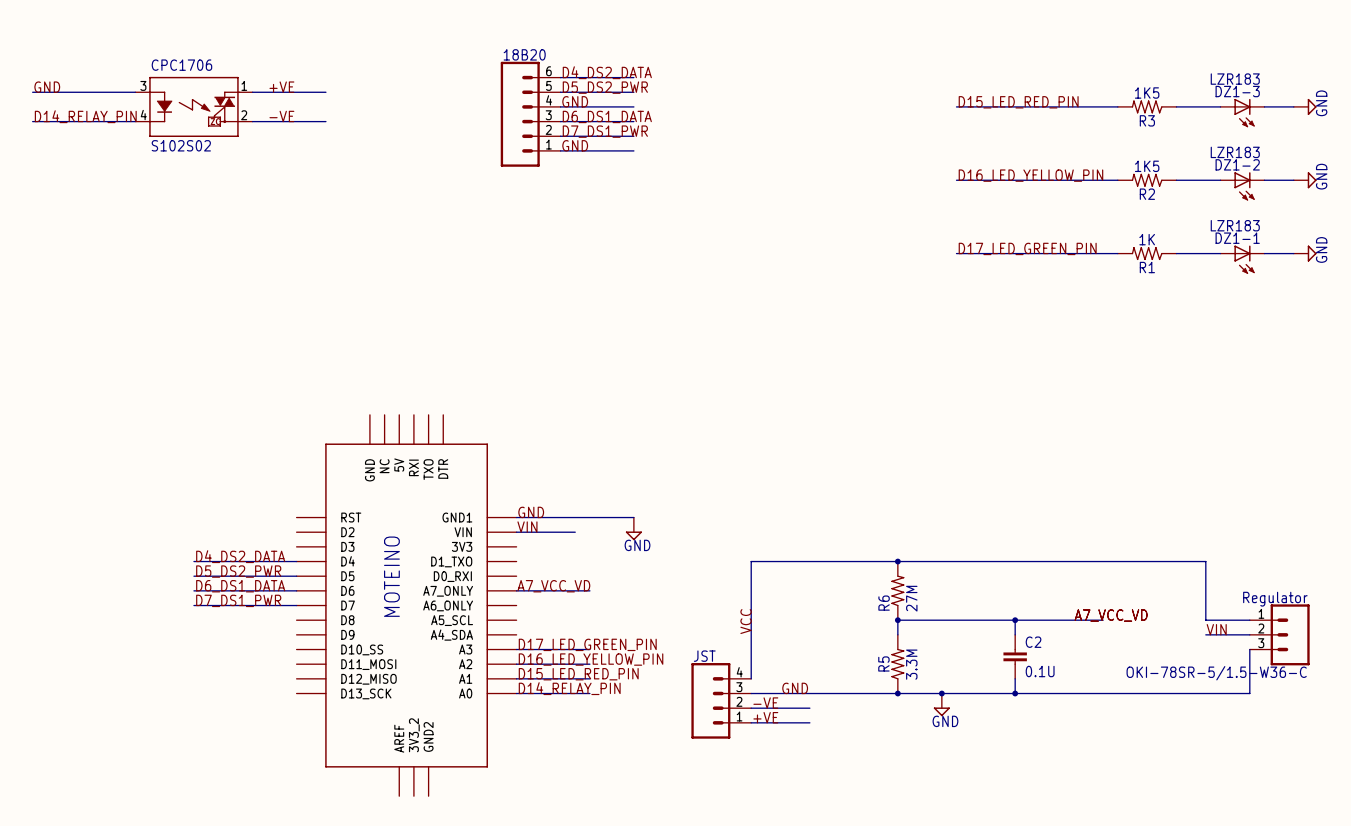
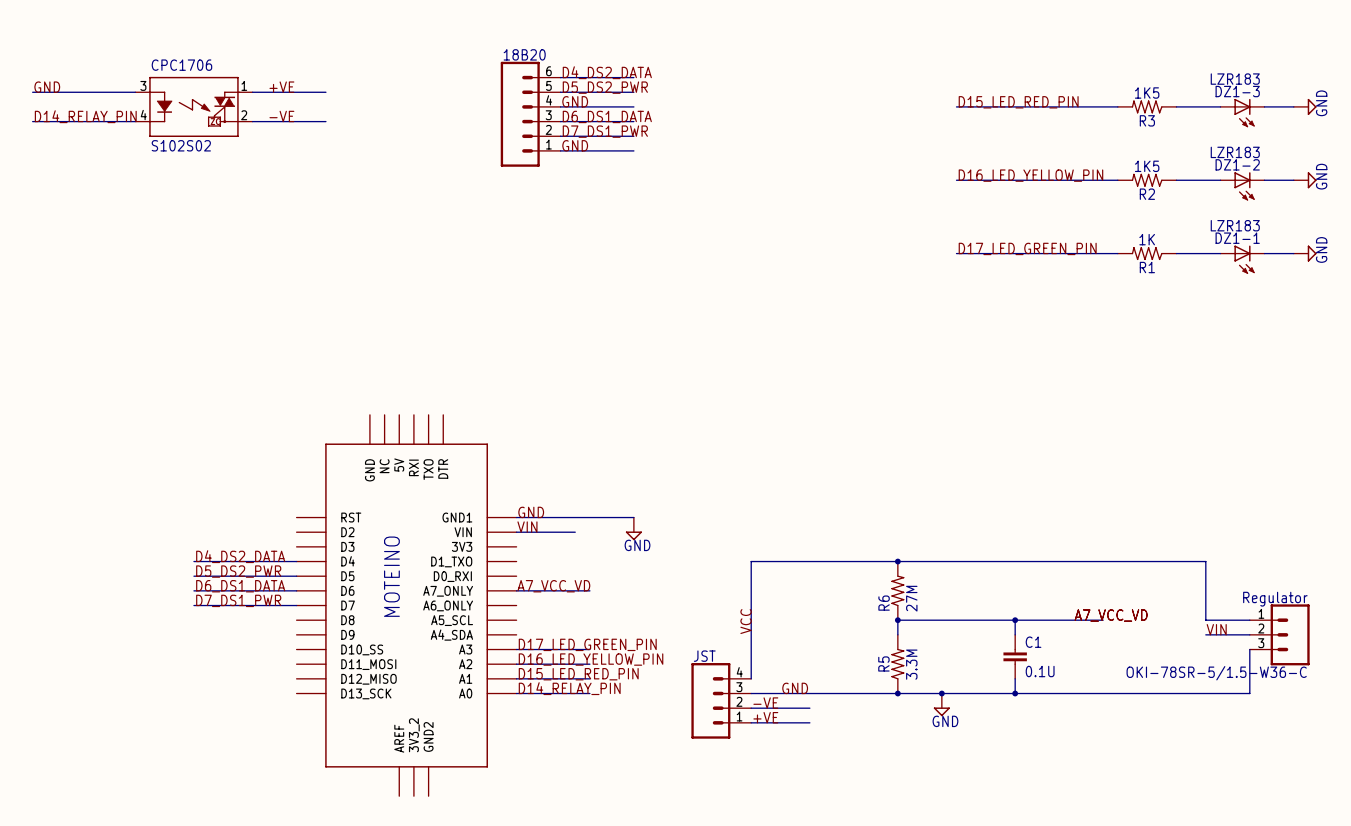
C2 name: C2 (1033, 642) -> C1 (1033, 642)

